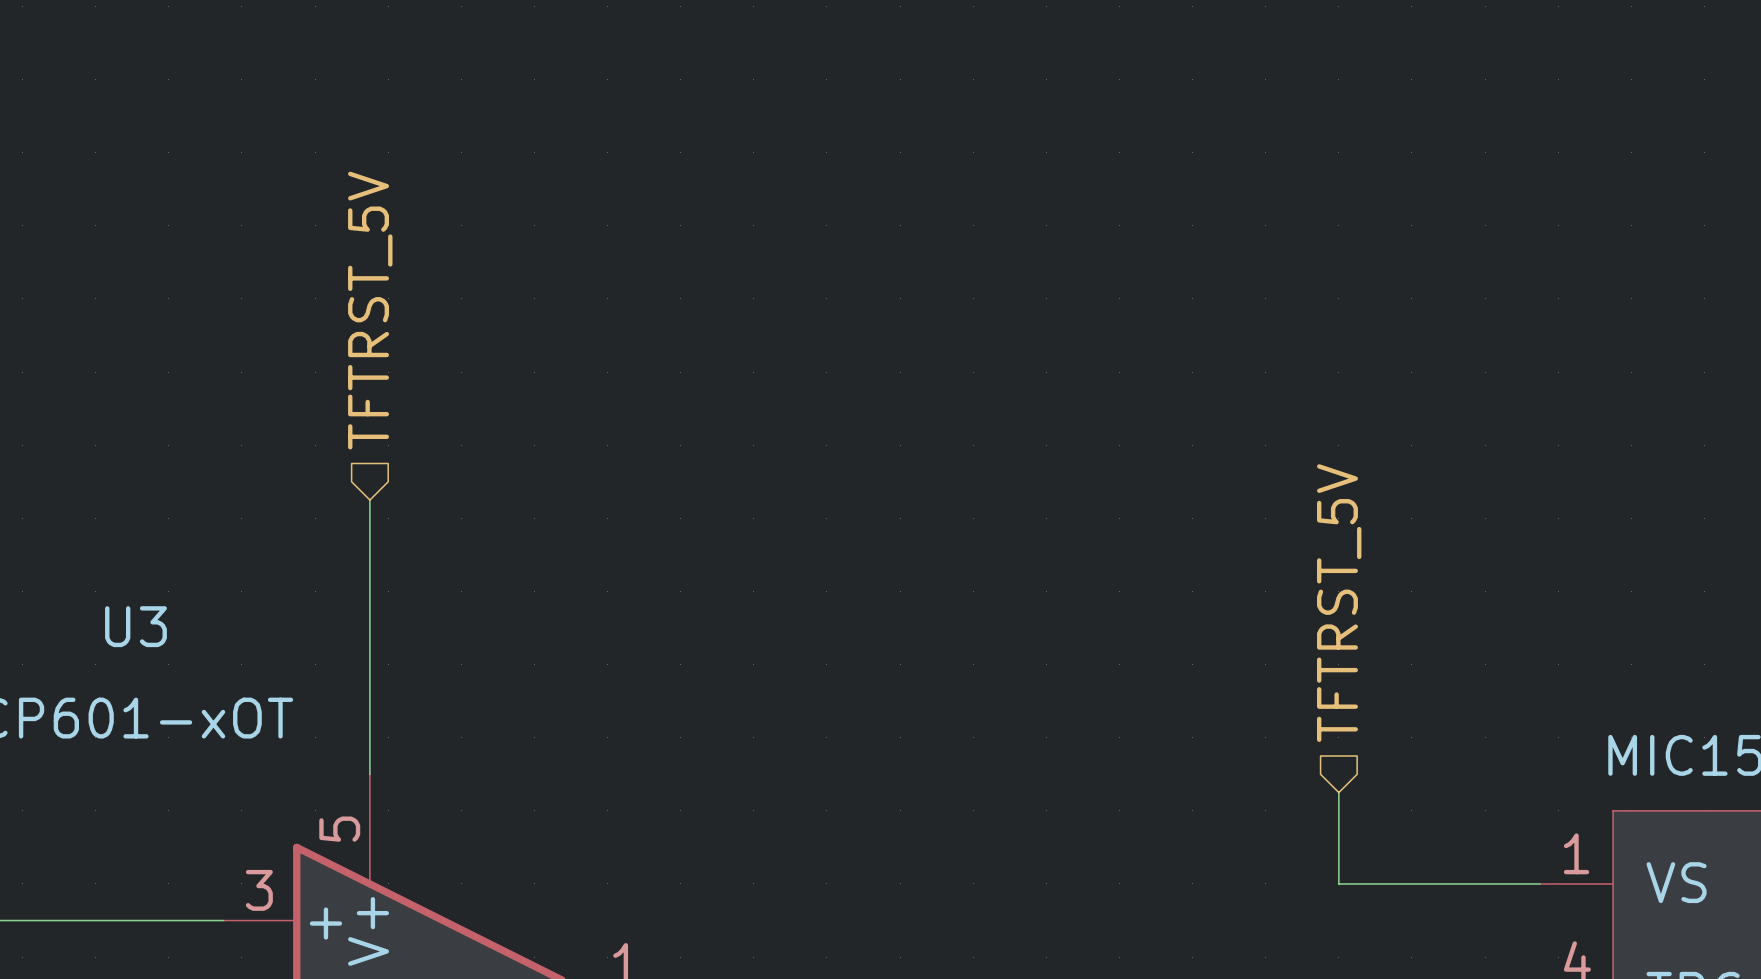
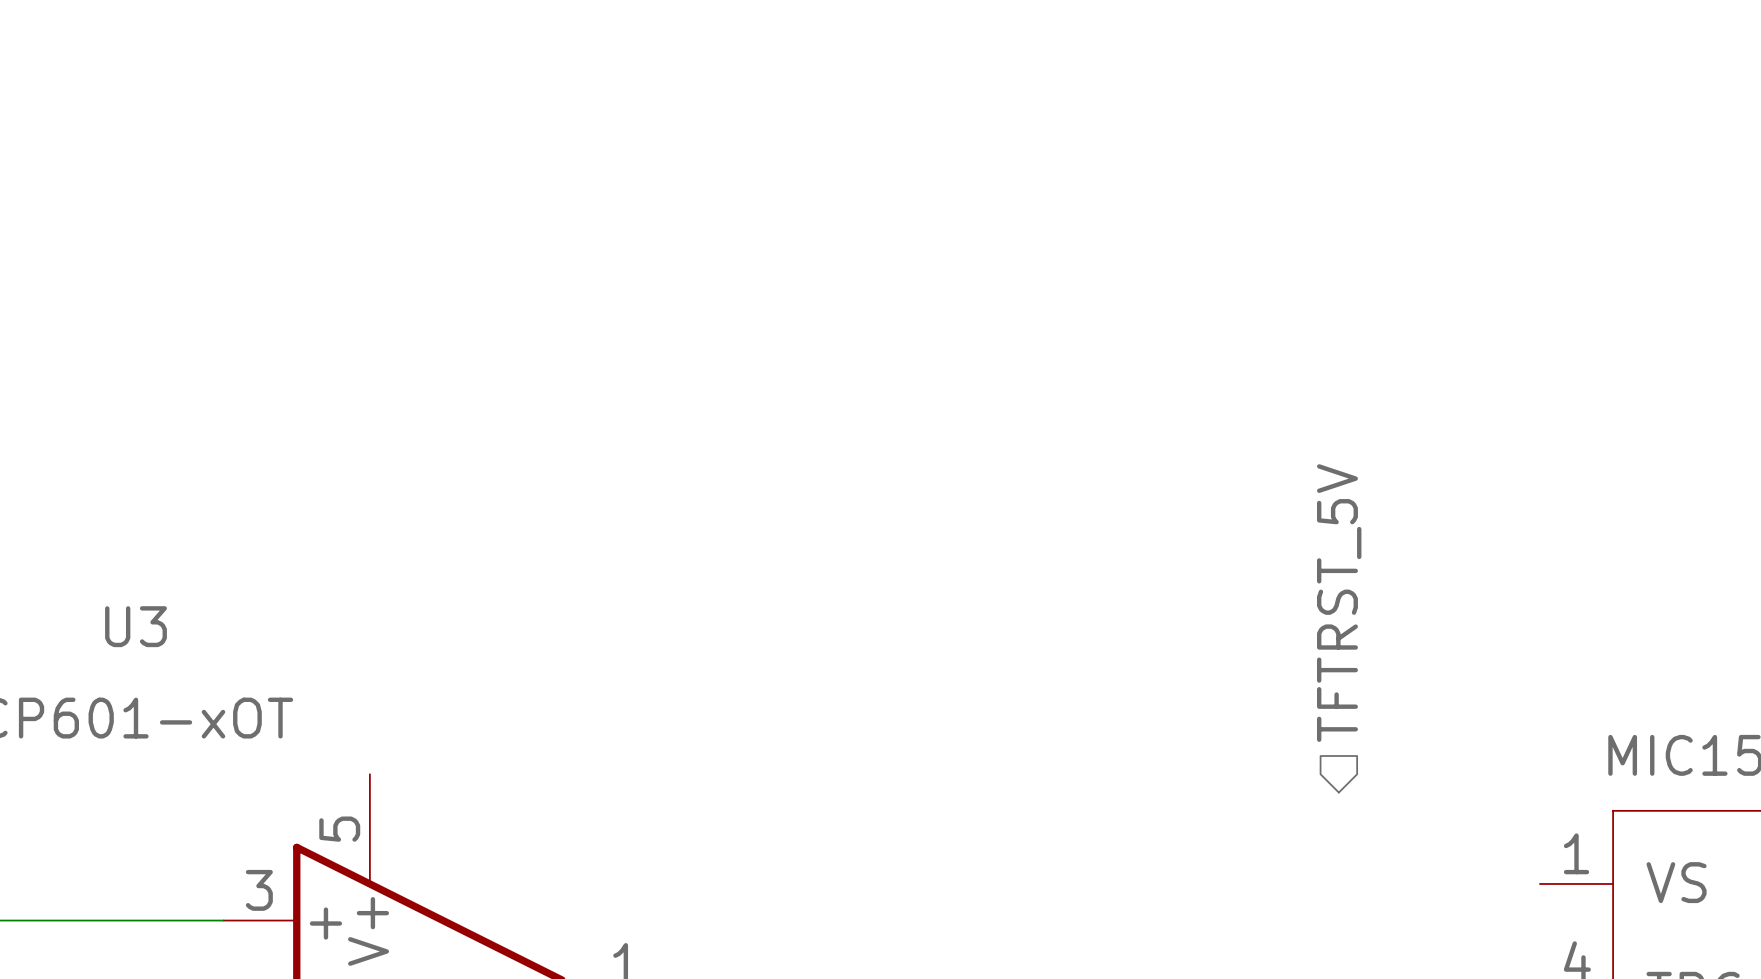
hierarchical label: TFTRST_5V (370, 310) -> none
wire: (369, 500) (369, 774) -> none
wire: (1338, 792) (1338, 883) (1539, 883) -> none

